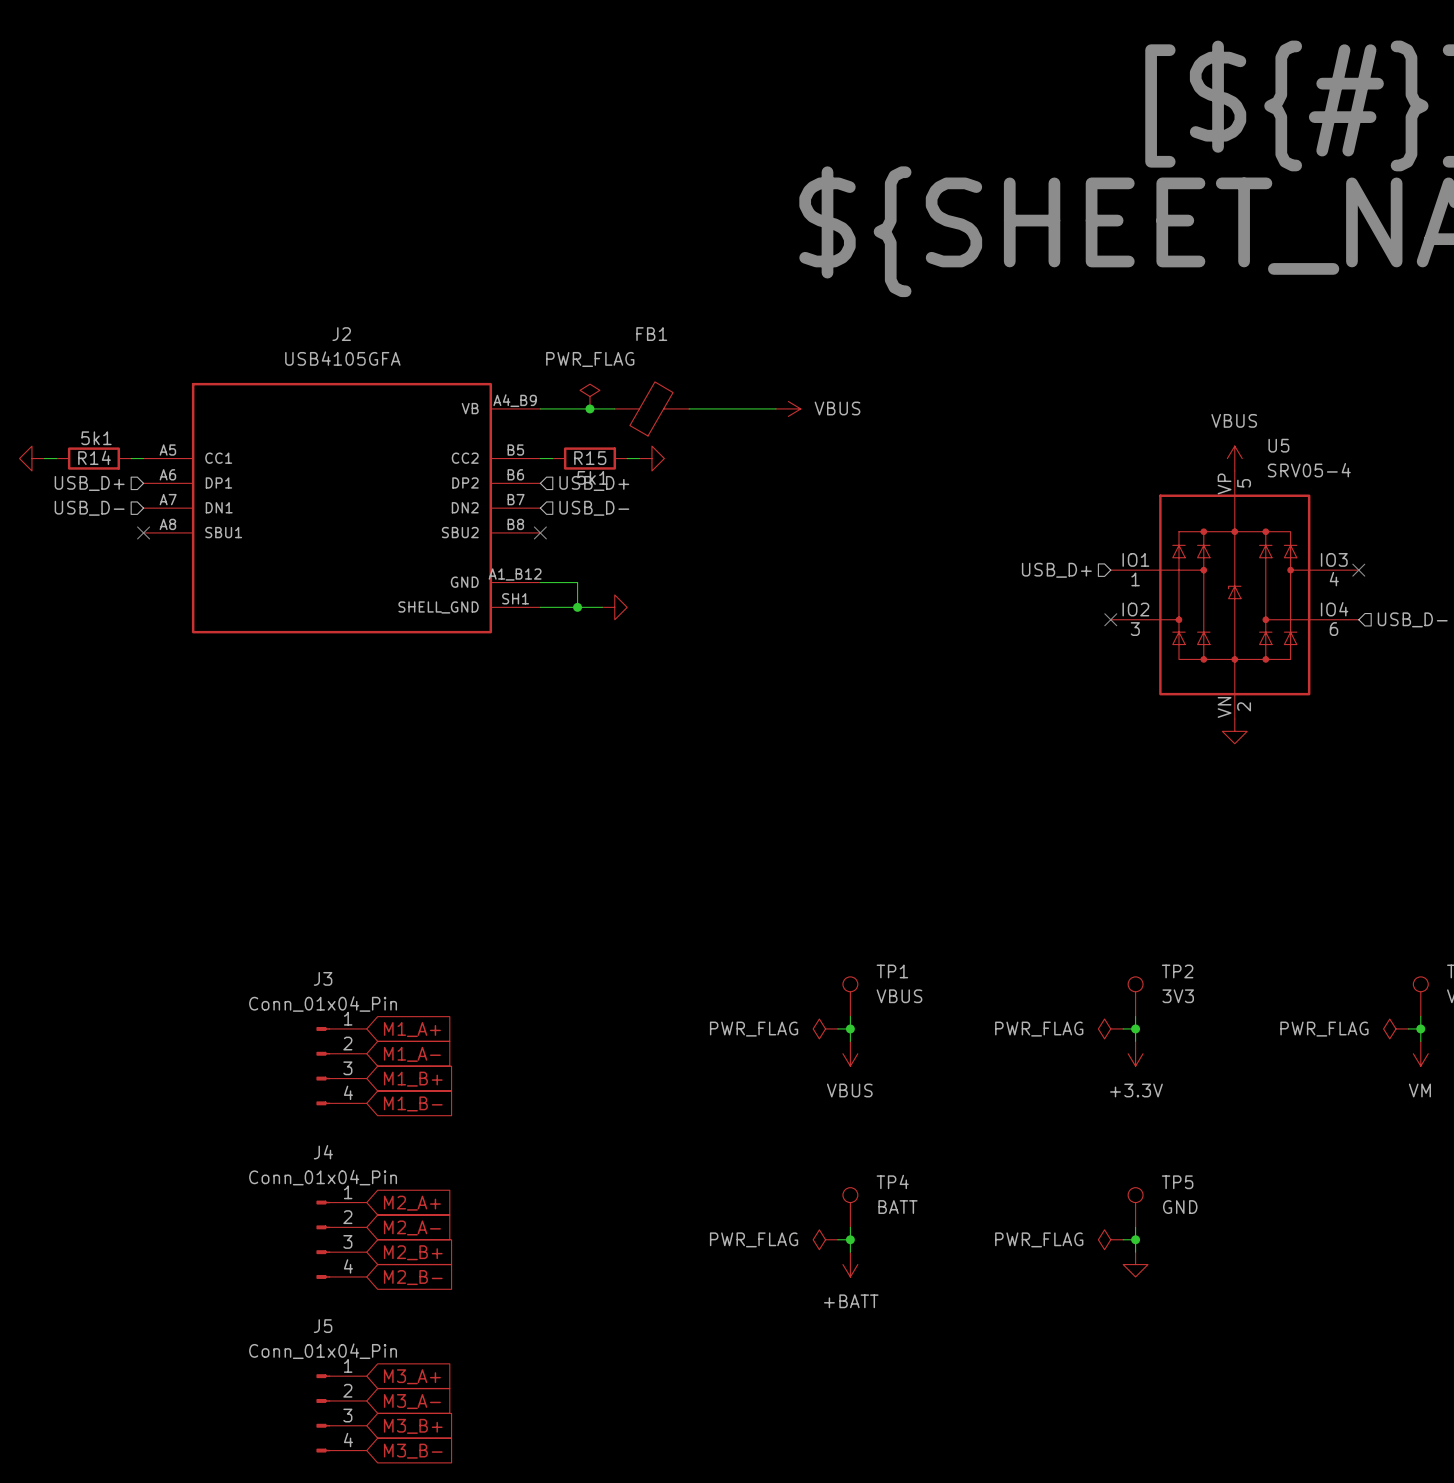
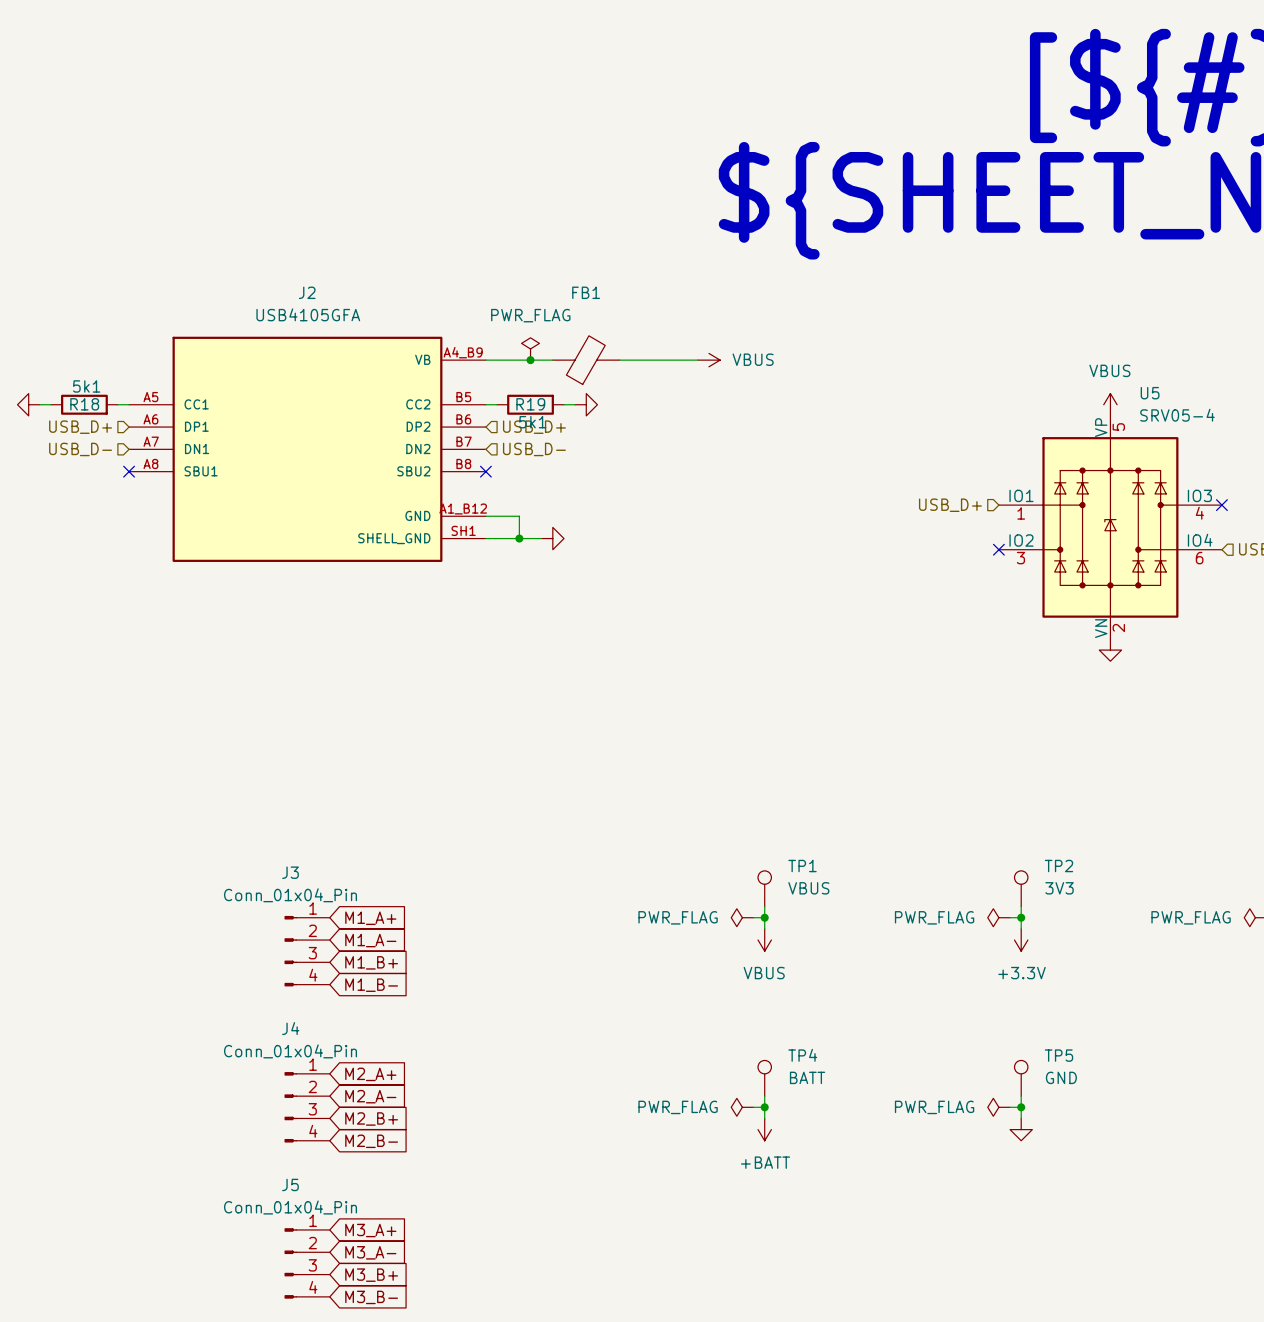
R14 name: R14 (94, 457) -> R18 (84, 404)
R15 name: R15 (590, 458) -> R19 (530, 404)

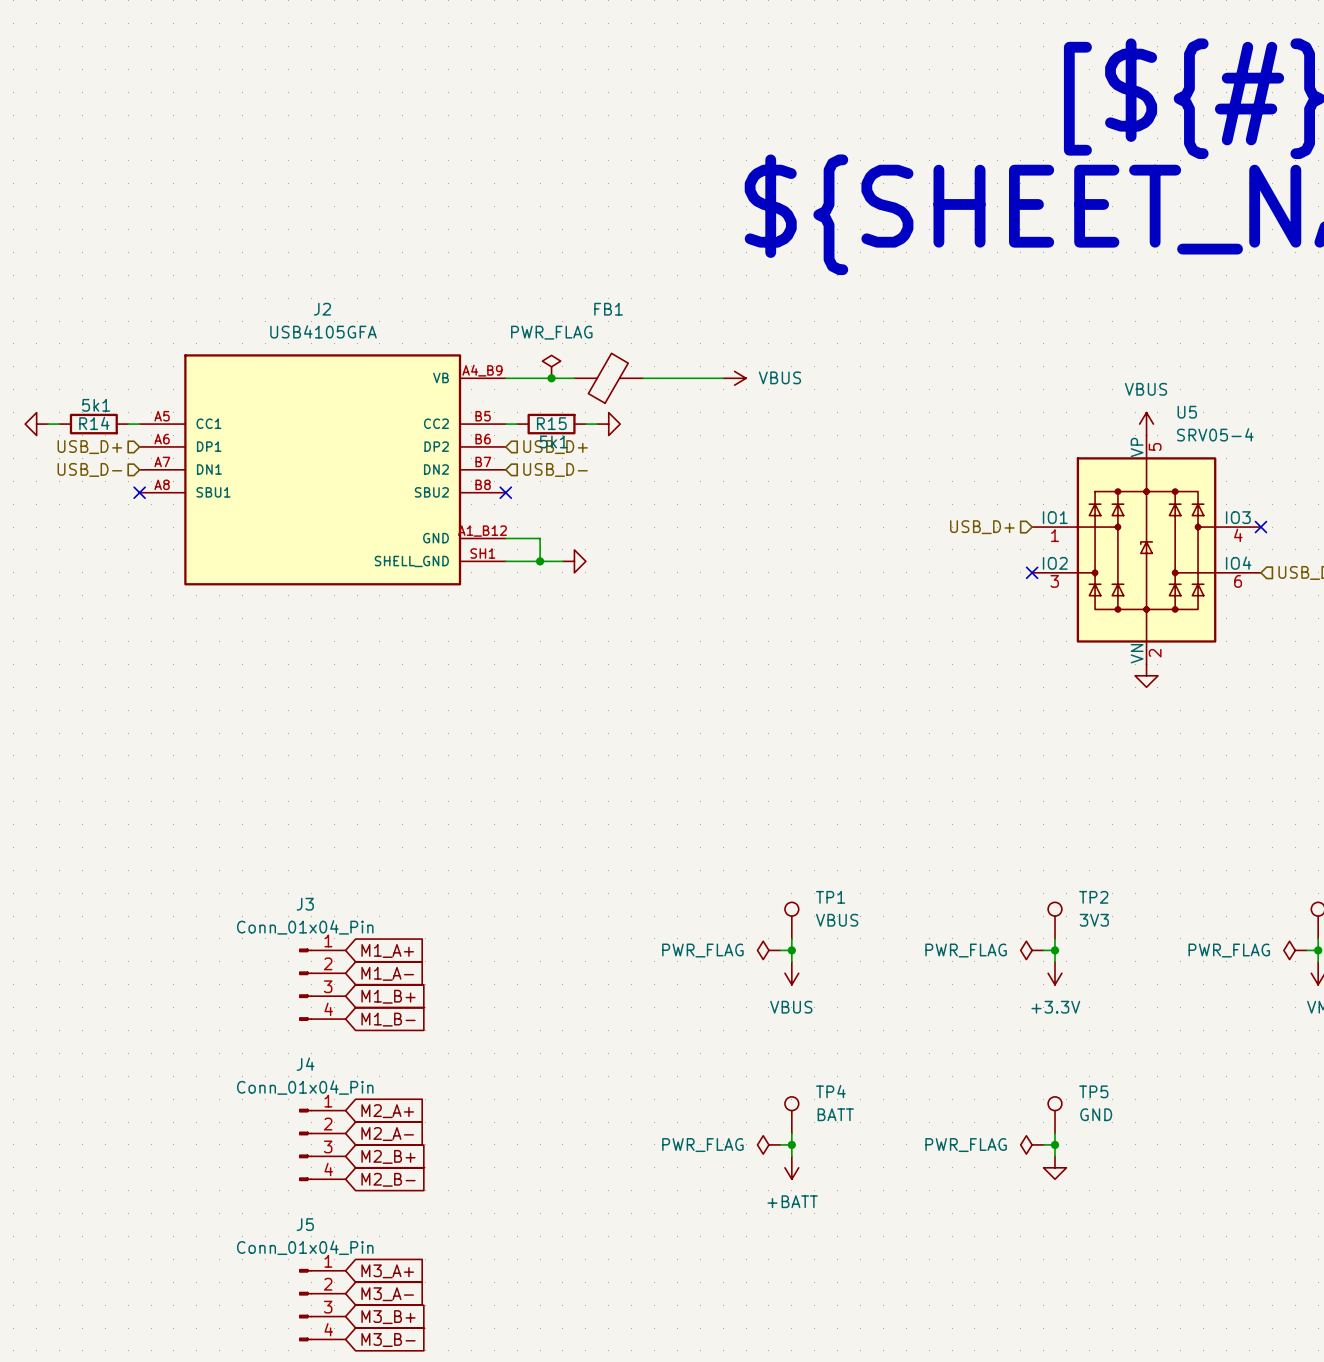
R18 name: R18 (84, 404) -> R14 (94, 423)
R19 name: R19 (530, 404) -> R15 (551, 423)

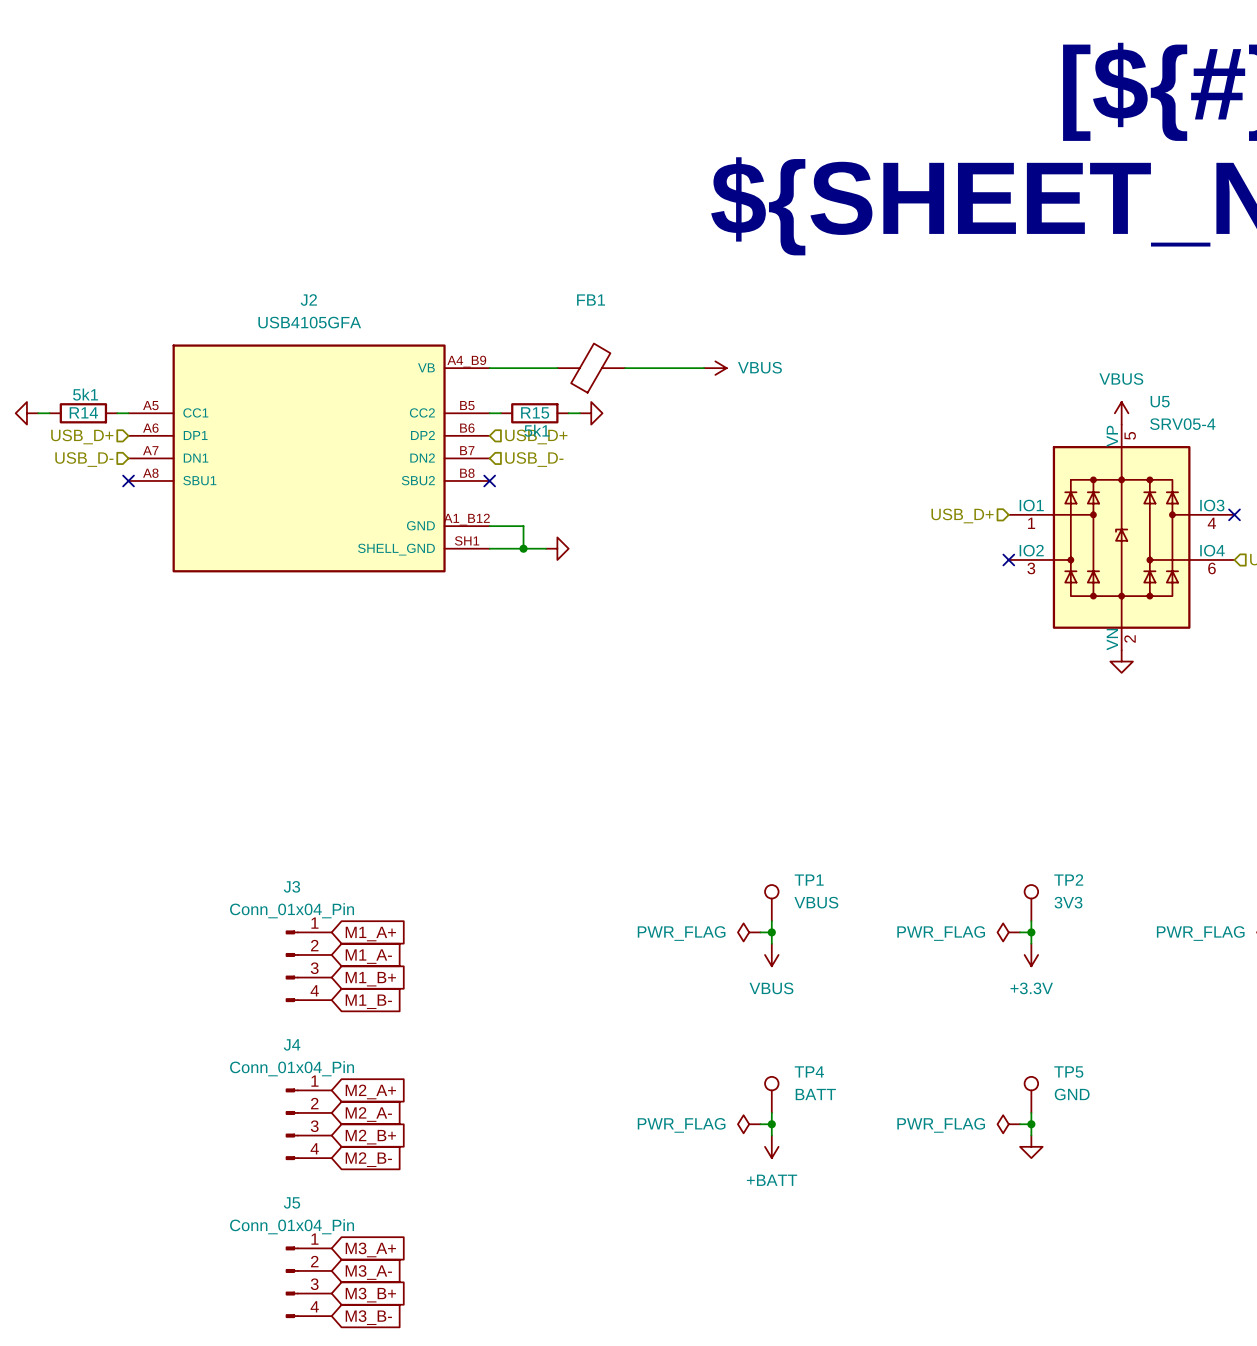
power symbol: PWR_FLAG (551, 366) -> none
junction: (551, 378) -> none

